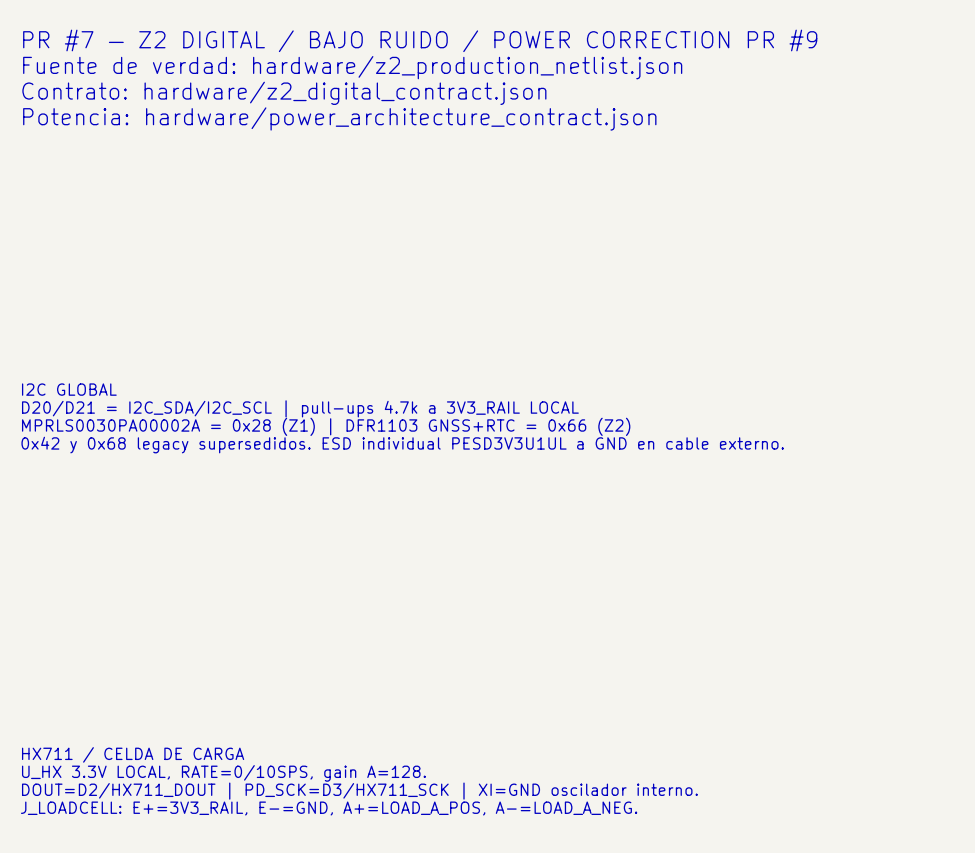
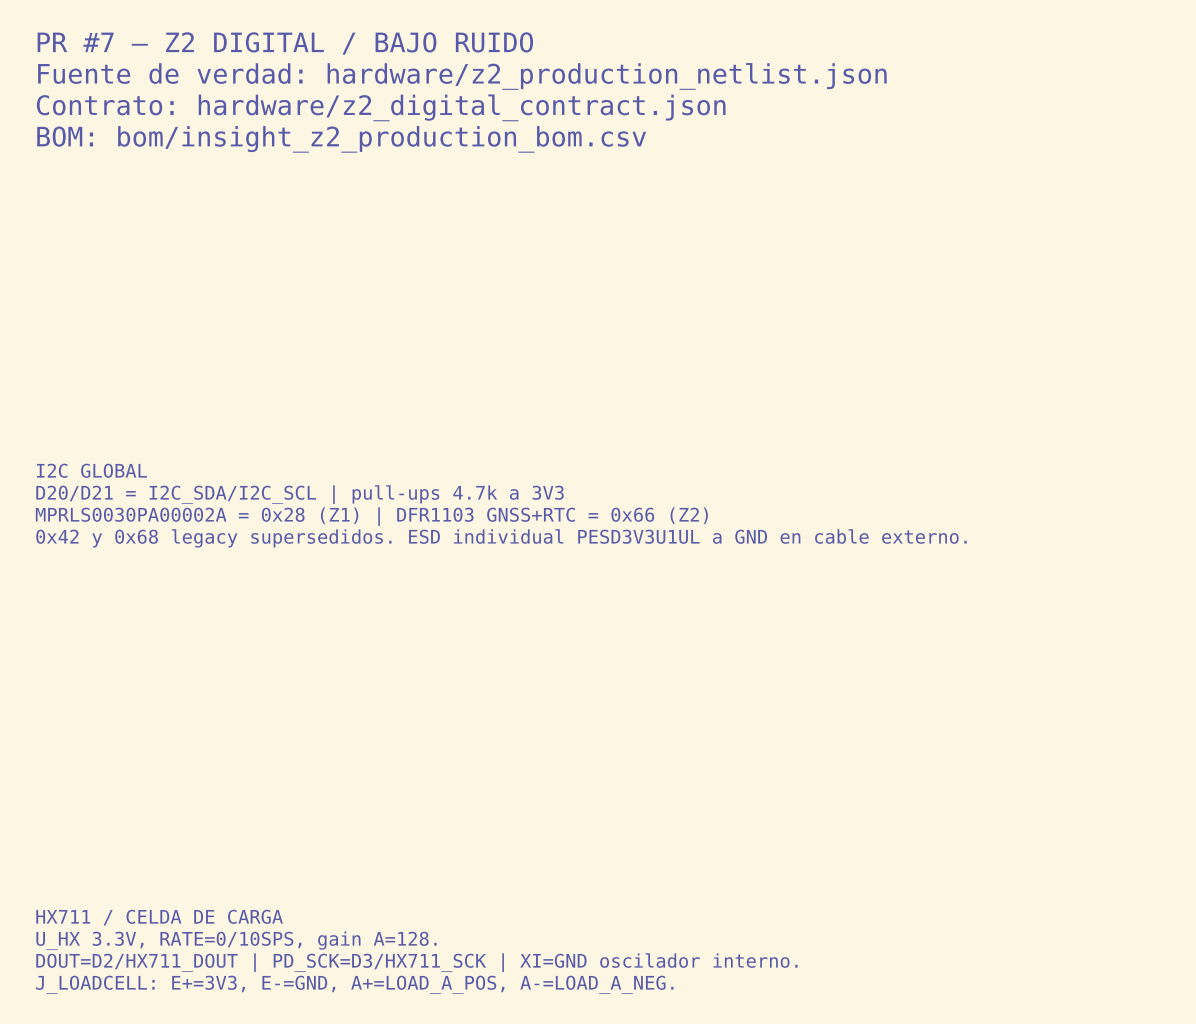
text: PR #7 — Z2 DIGITAL / BAJO RUIDO / POWER CORRECTION PR #9 (420, 40) -> PR #7 — Z2 DIGITAL / BAJO RUIDO (285, 43)
text: Potencia: hardware/power_architecture_contract.json (339, 118) -> BOM: bom/insight_z2_production_bom.csv (341, 139)
text: D20/D21 = I2C_SDA/I2C_SCL | pull-ups 4.7k a 3V3_RAIL LOCAL (300, 408) -> D20/D21 = I2C_SDA/I2C_SCL | pull-ups 4.7k a 3V3 (300, 494)
text: U_HX 3.3V LOCAL, RATE=0/10SPS, gain A=128. (223, 773) -> U_HX 3.3V, RATE=0/10SPS, gain A=128. (236, 940)
text: J_LOADCELL: E+=3V3_RAIL, E-=GND, A+=LOAD_A_POS, A-=LOAD_A_NEG. (329, 808) -> J_LOADCELL: E+=3V3, E-=GND, A+=LOAD_A_POS, A-=LOAD_A_NEG. (354, 984)

